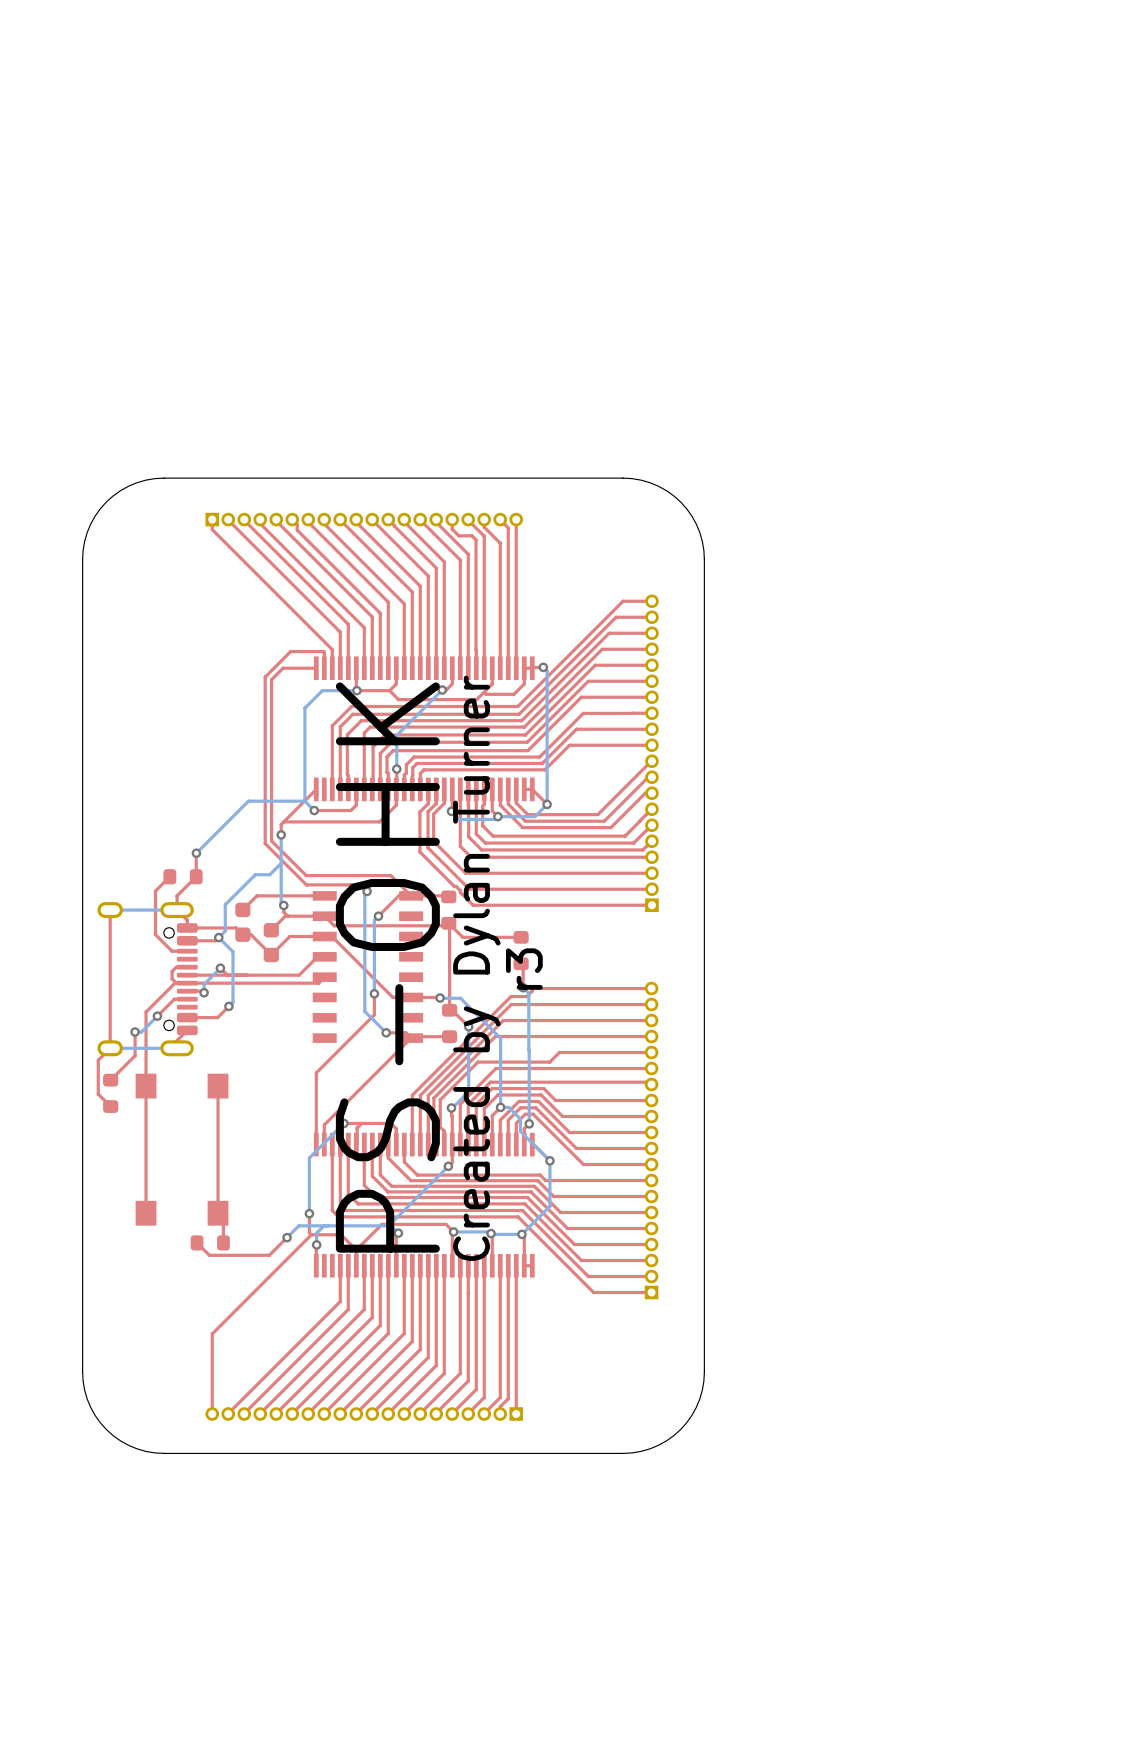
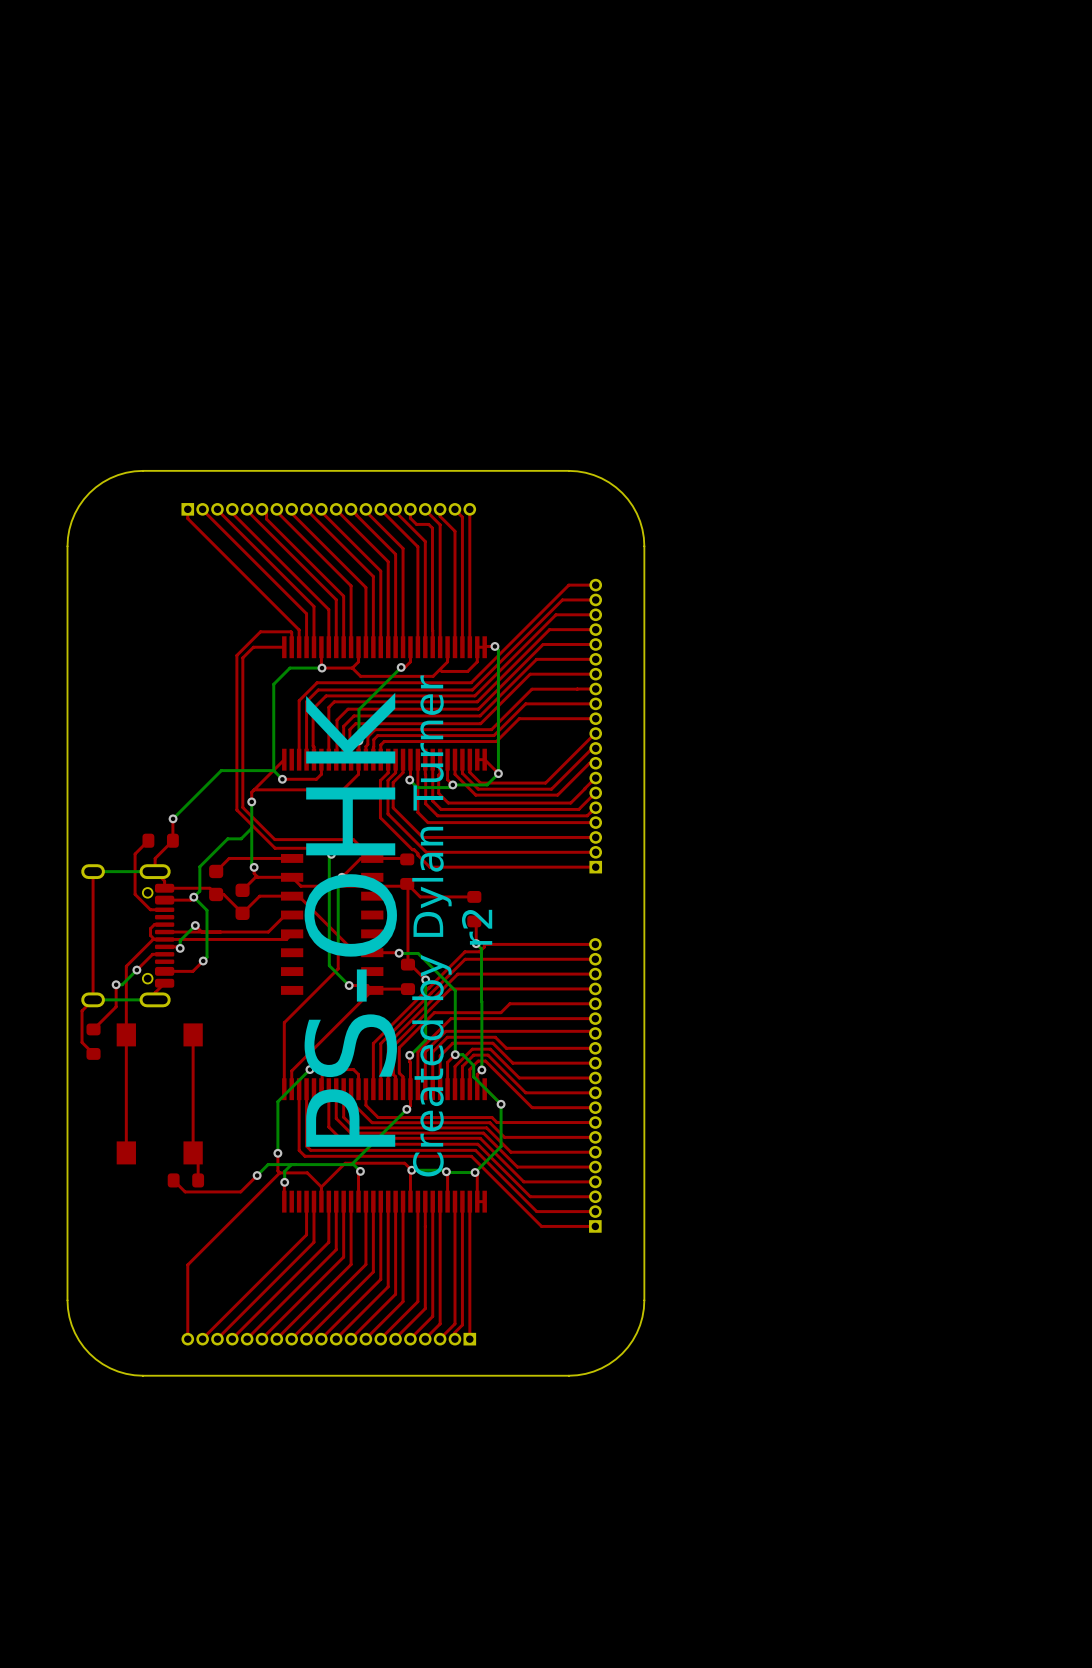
text: r3 (524, 969) -> r2 (477, 927)

